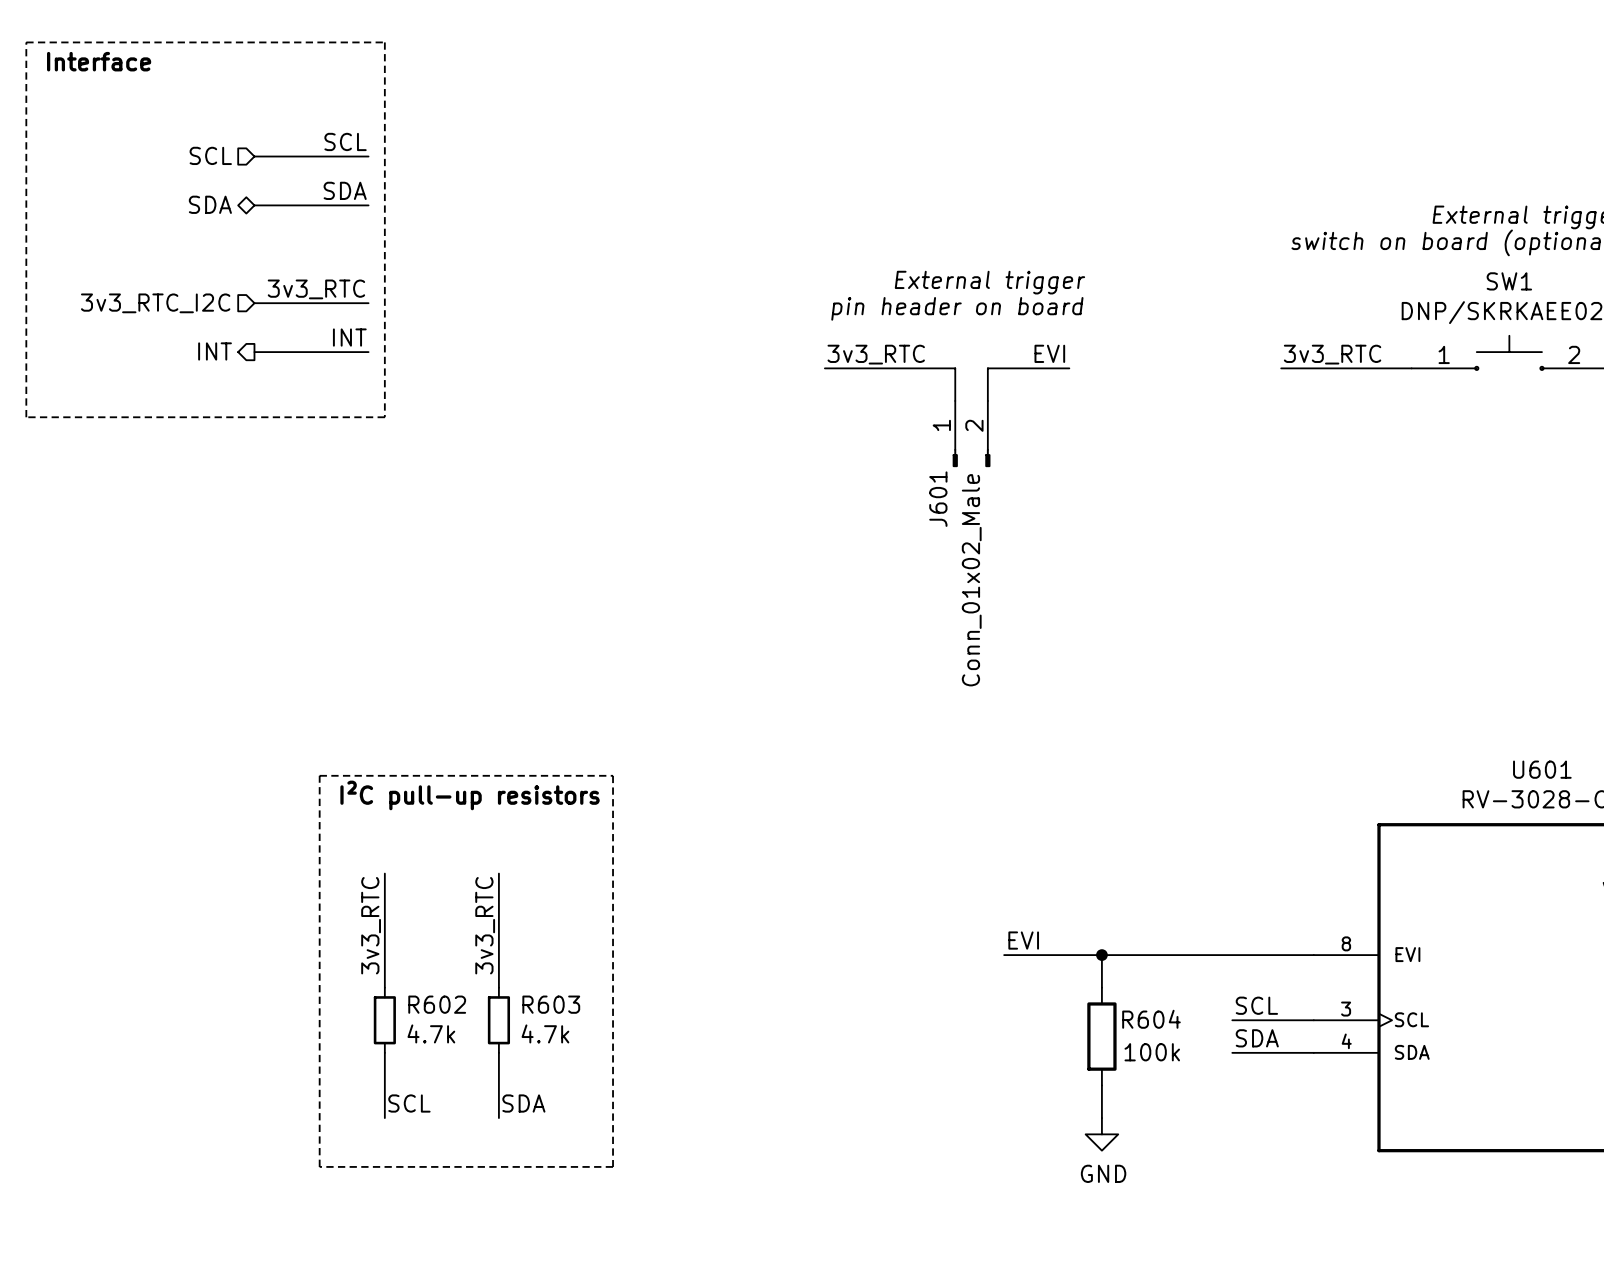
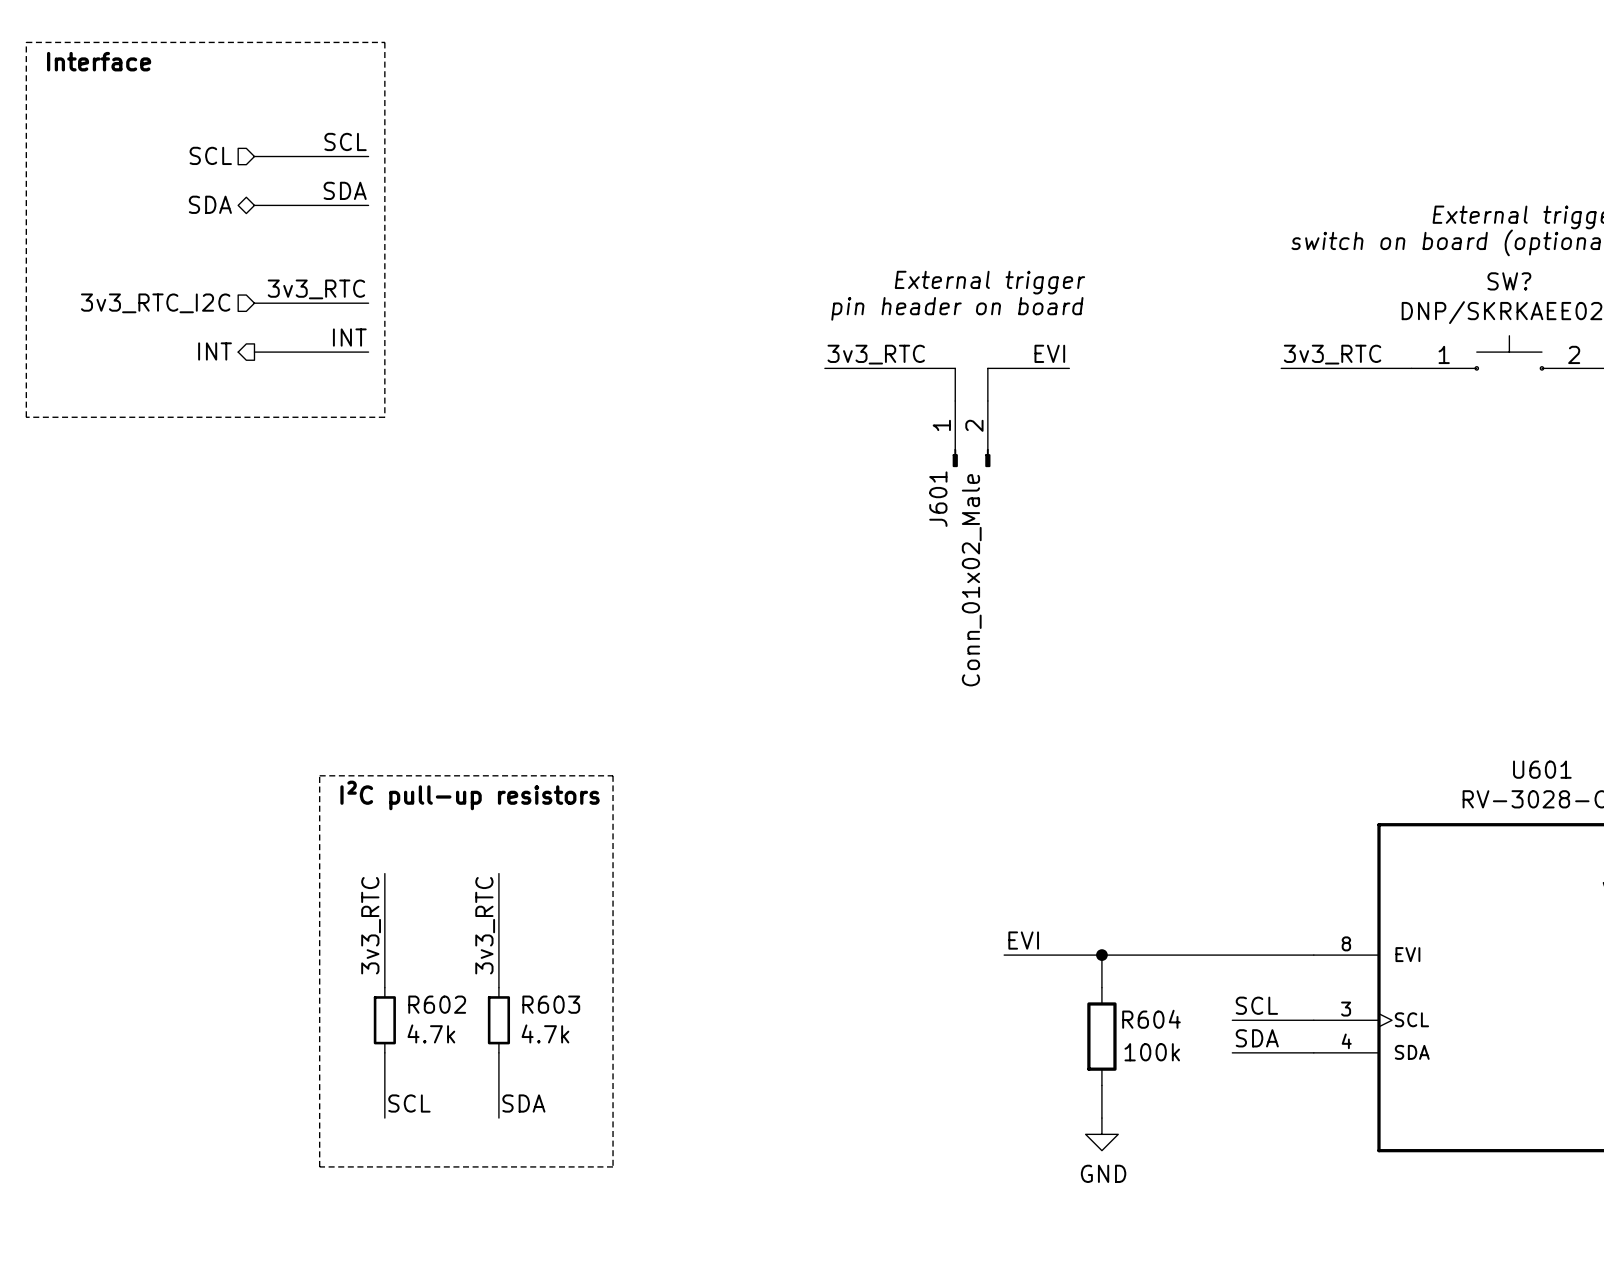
SW1 name: SW1 (1509, 281) -> SW? (1509, 281)

